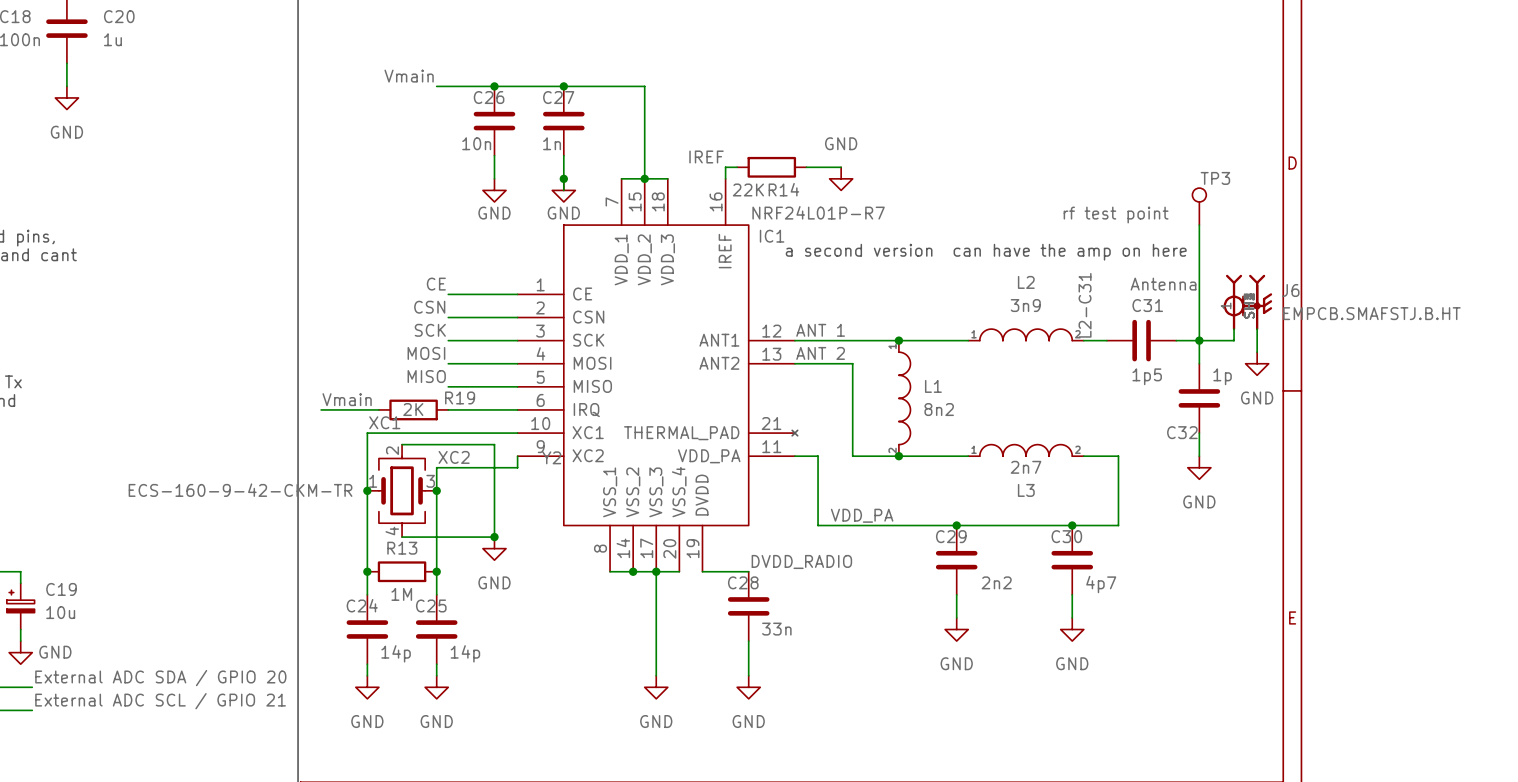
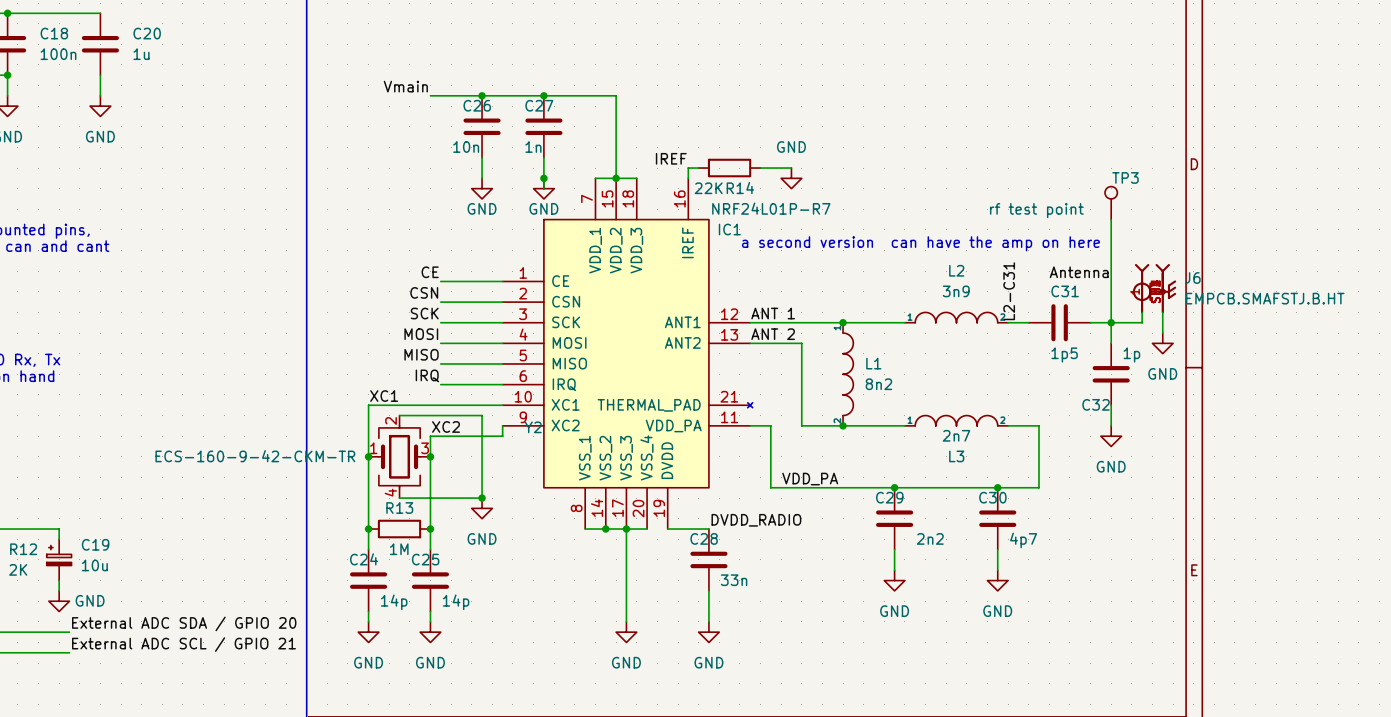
label: Vmain (347, 399) -> none
label: none -> IRQ (427, 375)
wire: (321, 409) (378, 409) -> none
R19: 2K (413, 409) -> none

